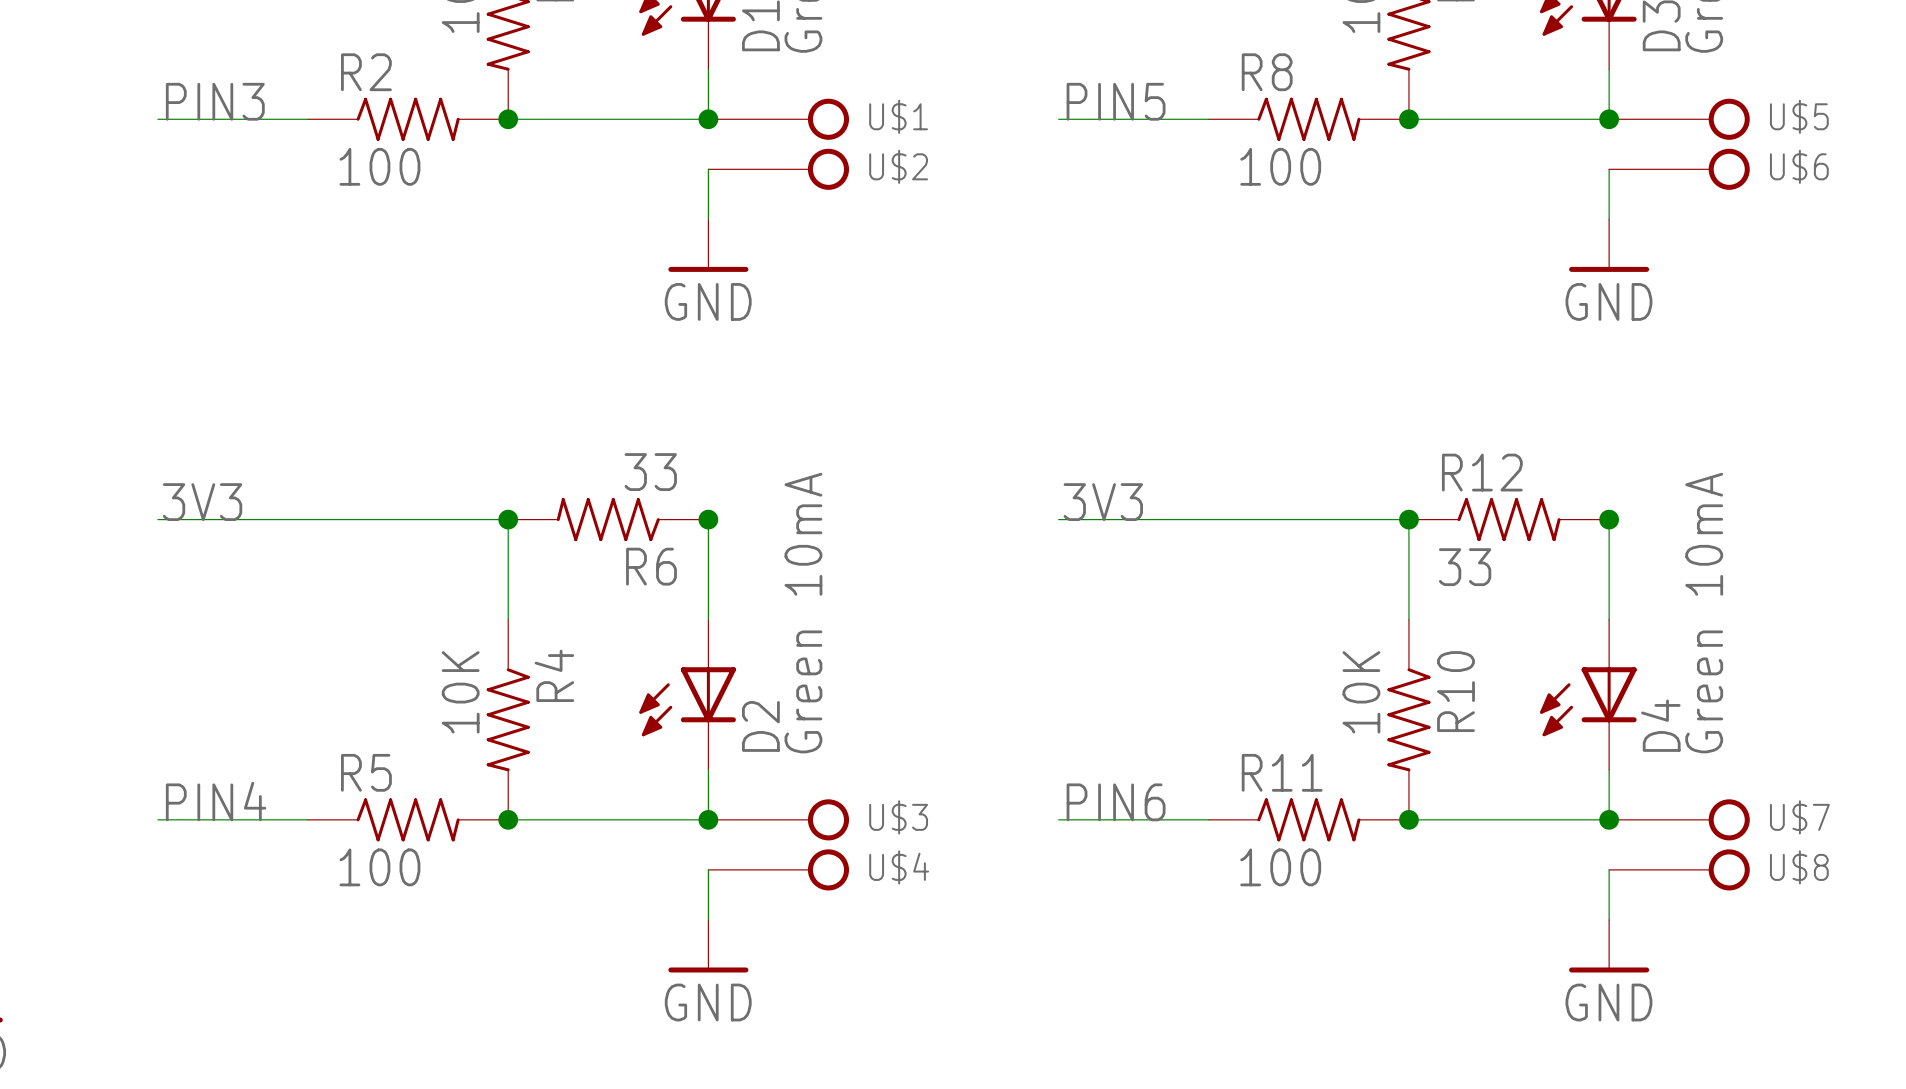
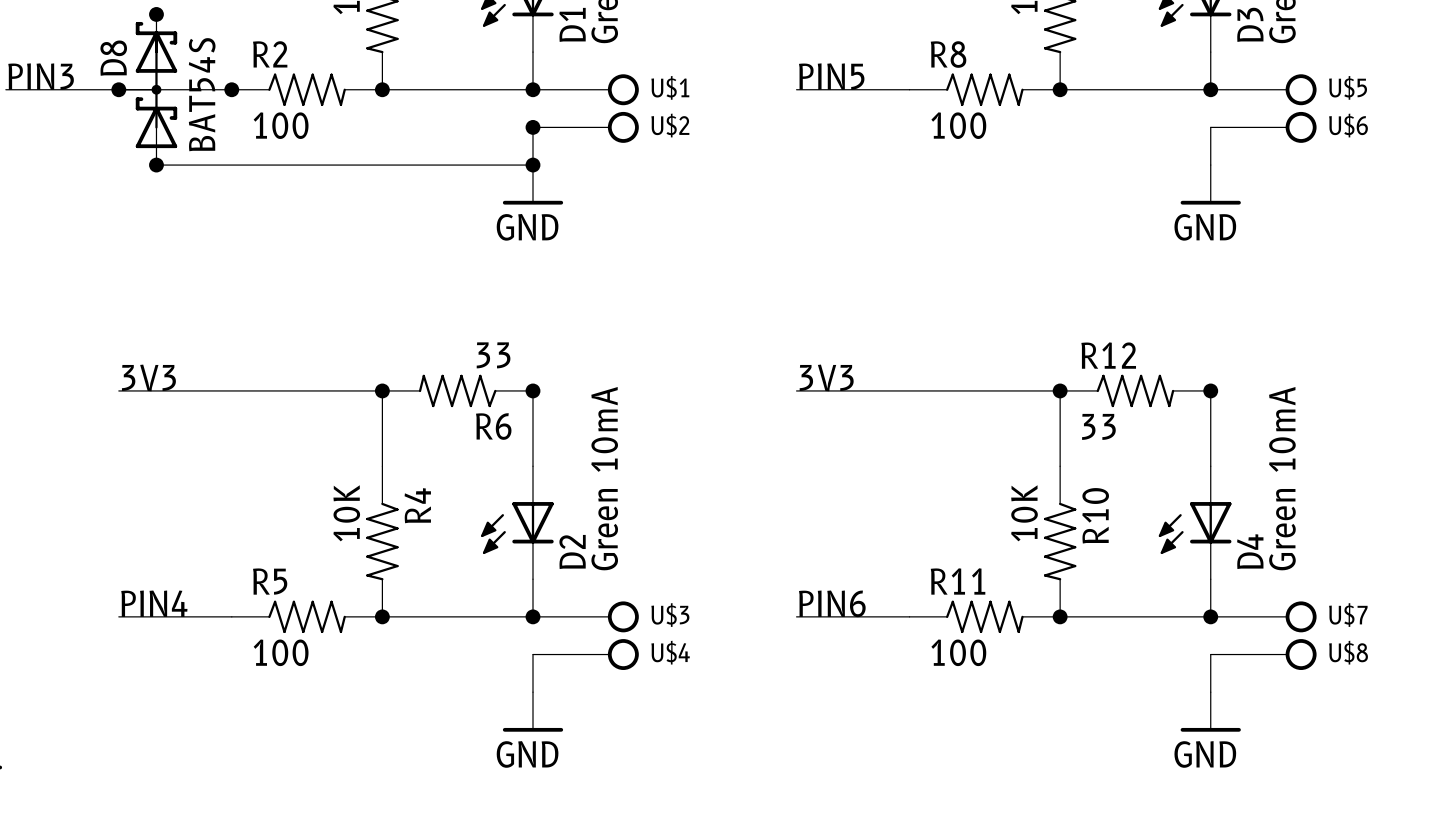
junction: none -> (156, 14)
label position: PIN3 (215, 101) -> PIN3 (41, 76)
wire: none -> (5, 89) (118, 89)
junction: none -> (118, 89)
D8: none -> BAT54S (148, 89)
junction: none -> (231, 89)
junction: none -> (533, 127)
wire: none -> (156, 165) (533, 165)
junction: none -> (156, 165)
junction: none -> (533, 165)

